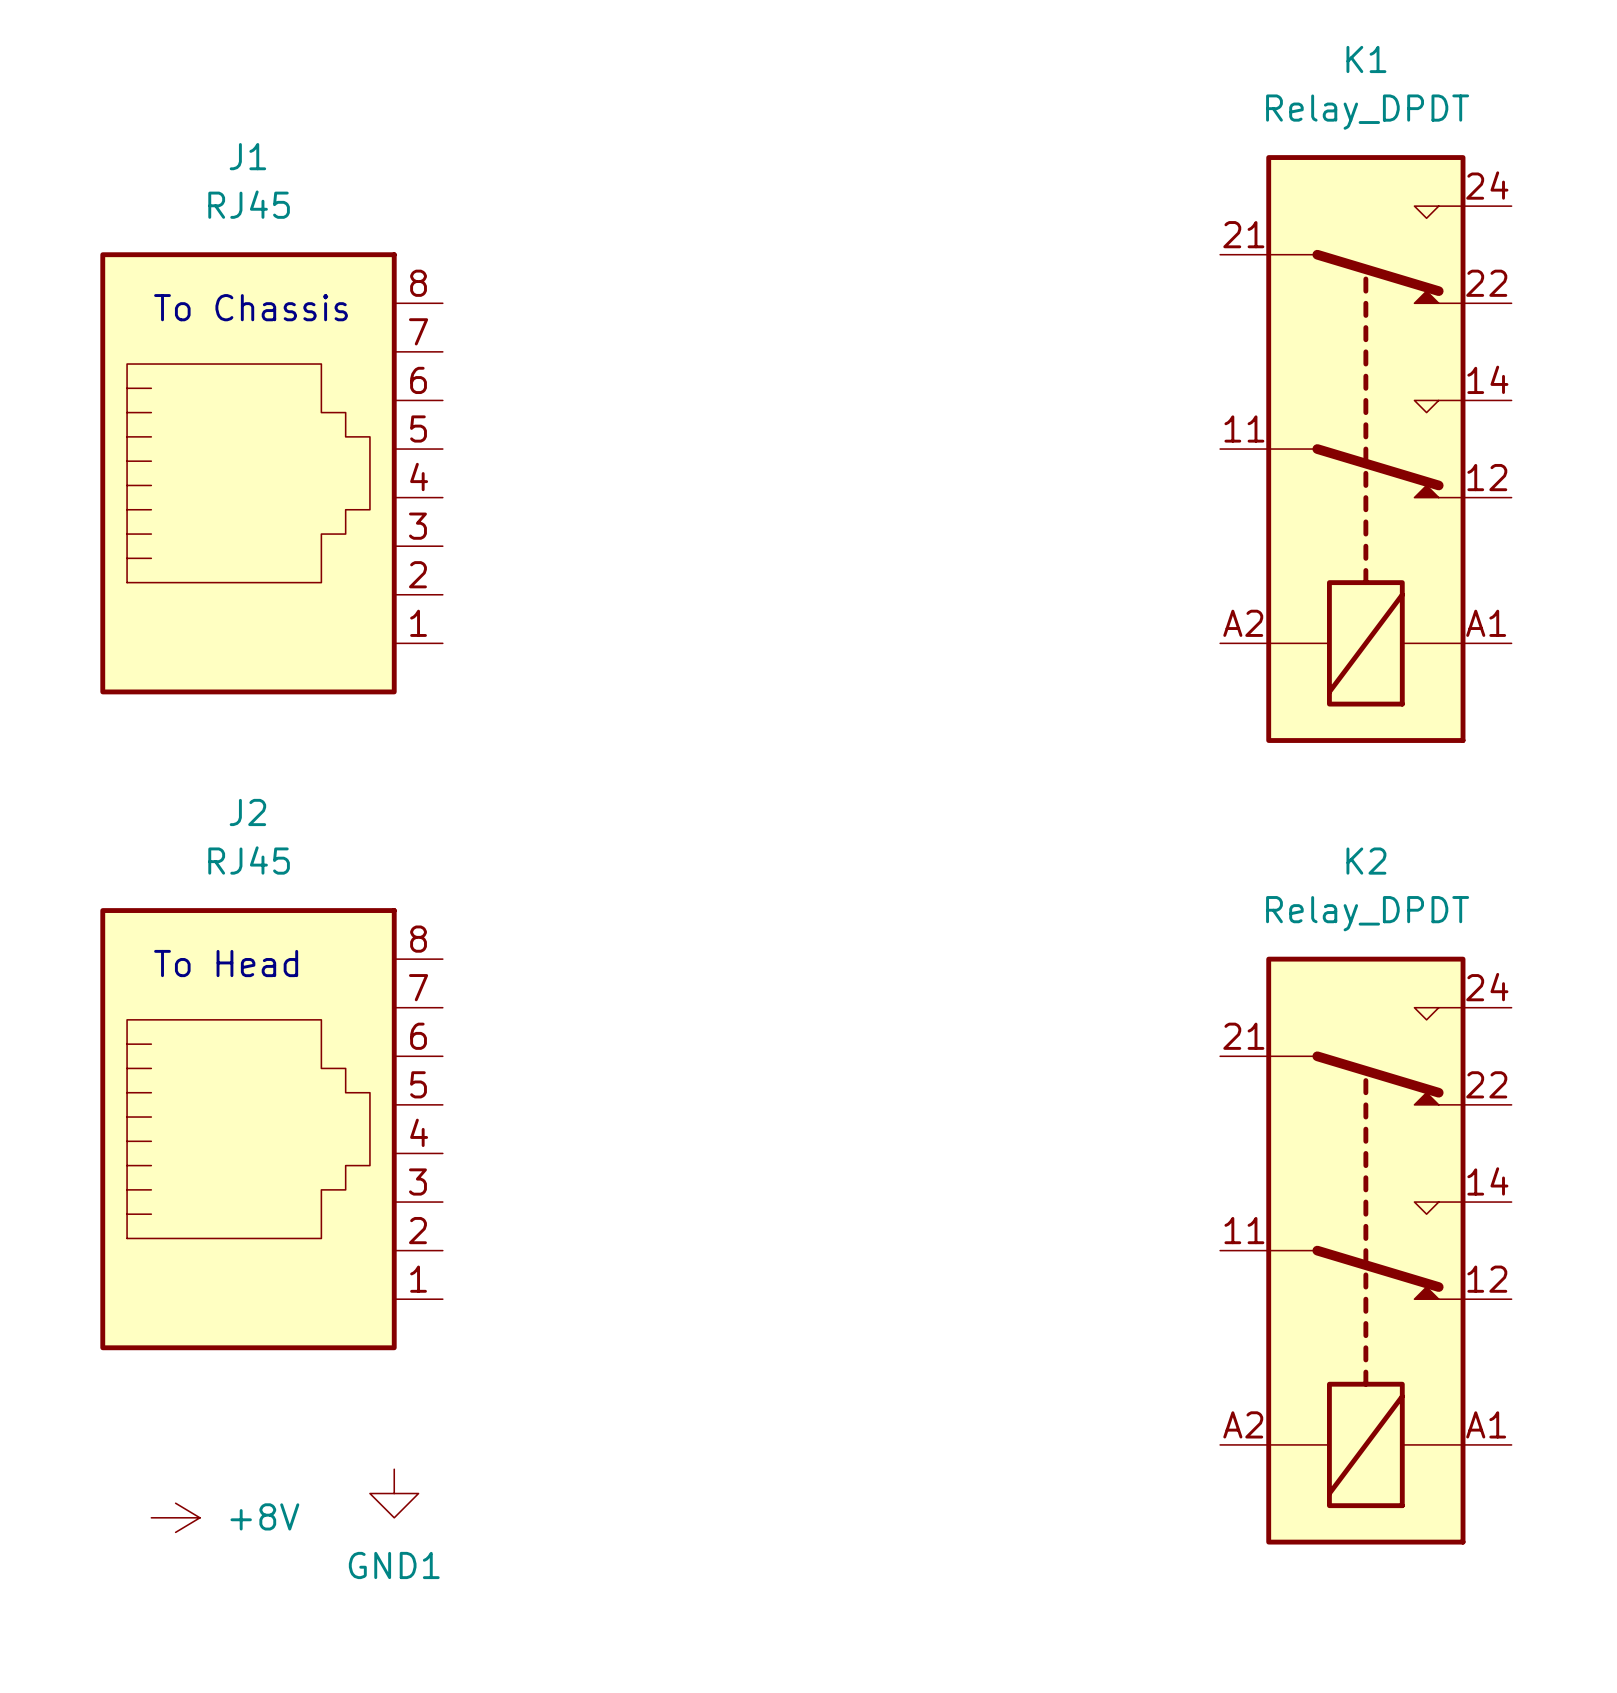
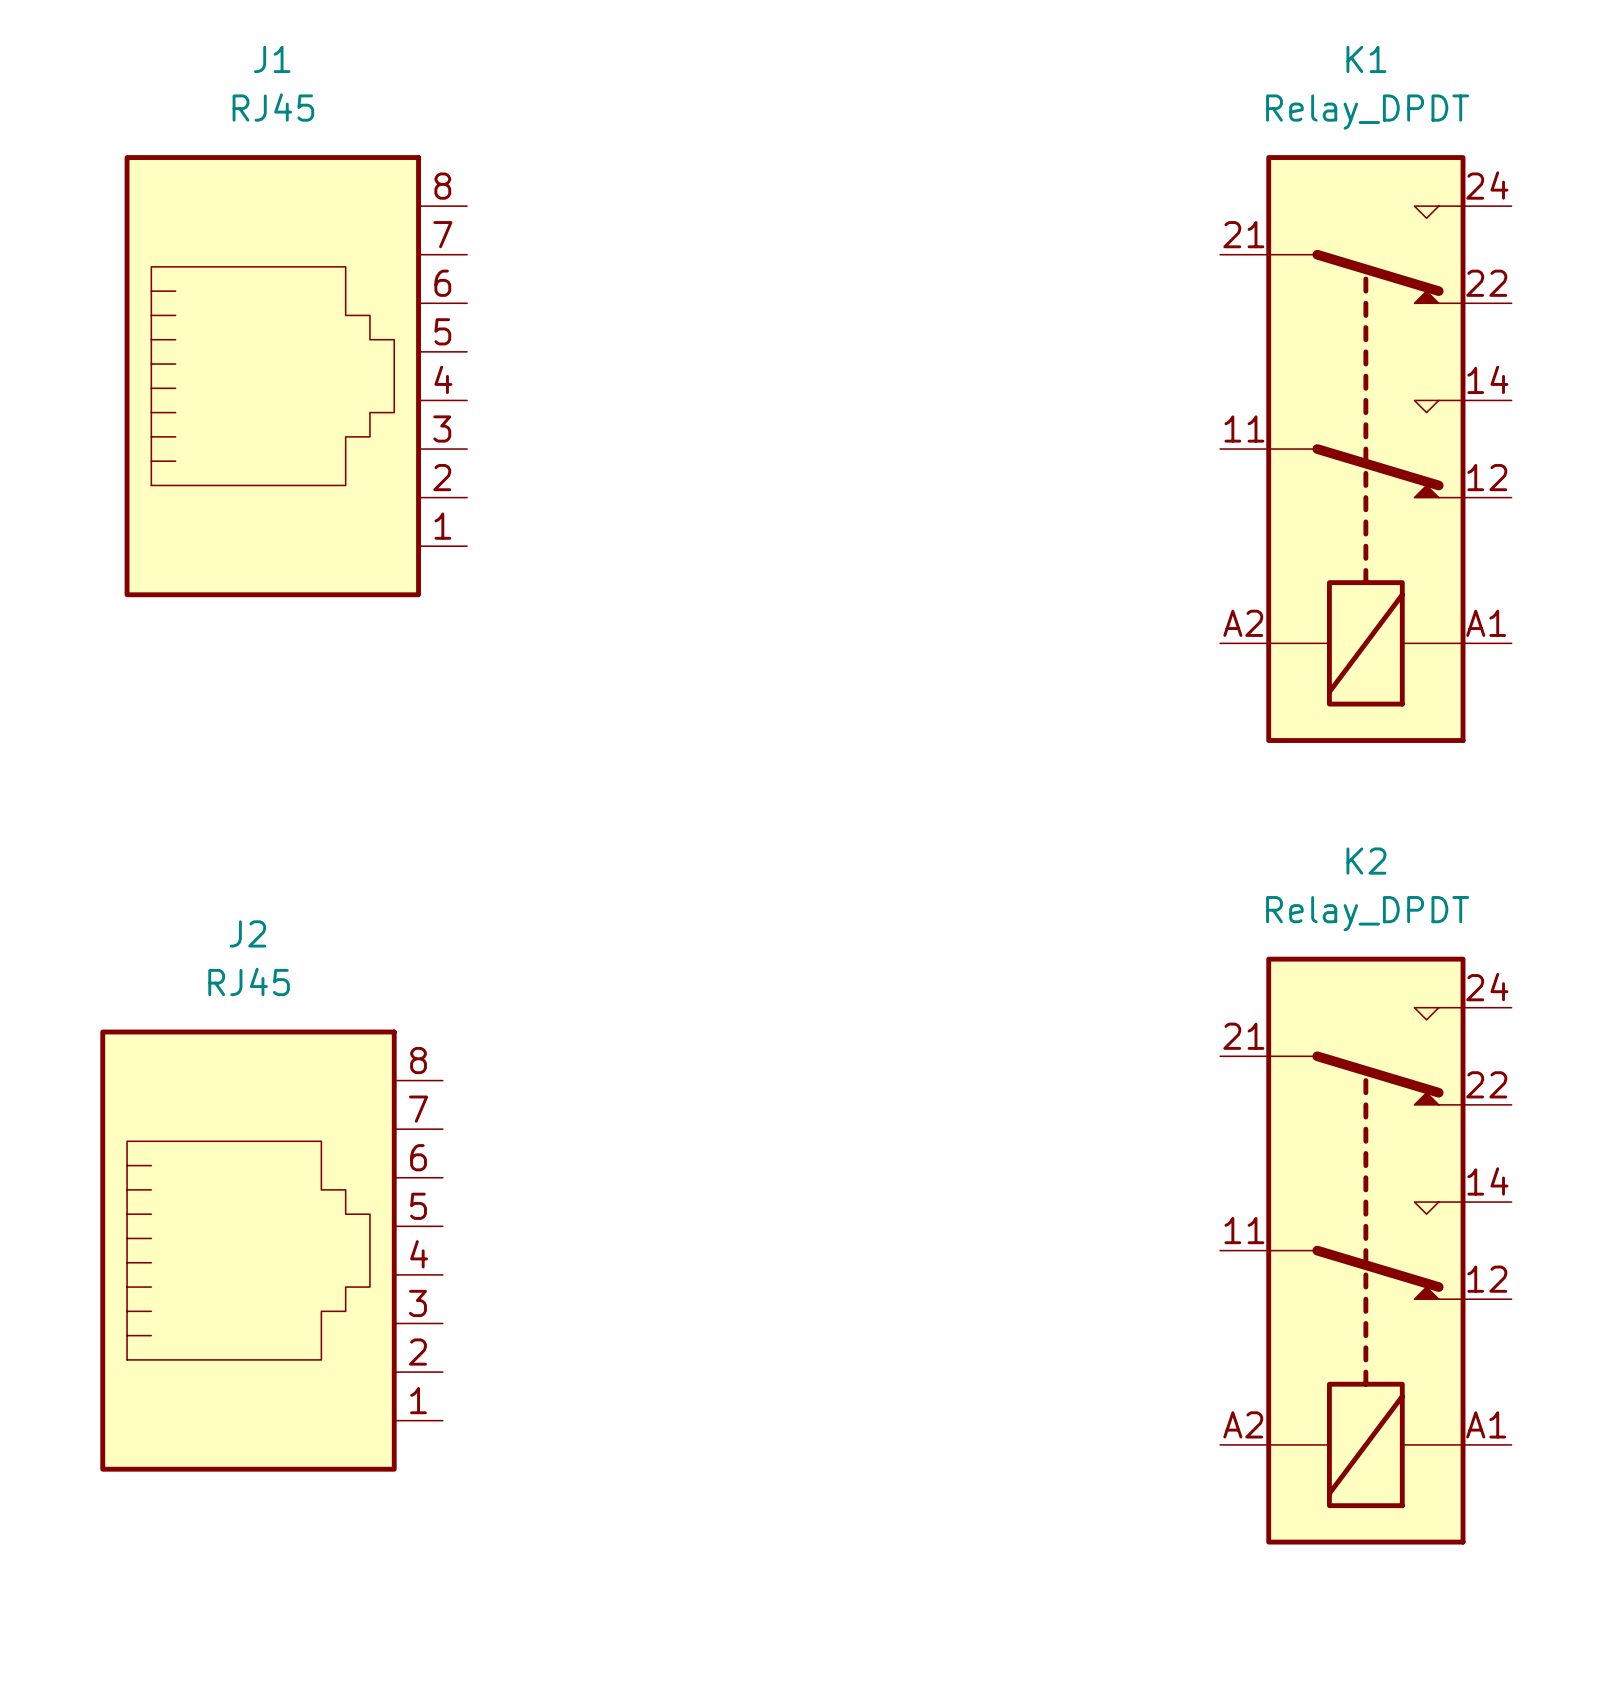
text: To Chassis (251, 307) -> none
J1 position: (271, 473) -> (295, 376)
text: To Head (226, 963) -> none
J2 position: (271, 1129) -> (271, 1250)
power symbol: GND1 (394, 1493) -> none
power symbol: +8V (175, 1517) -> none

